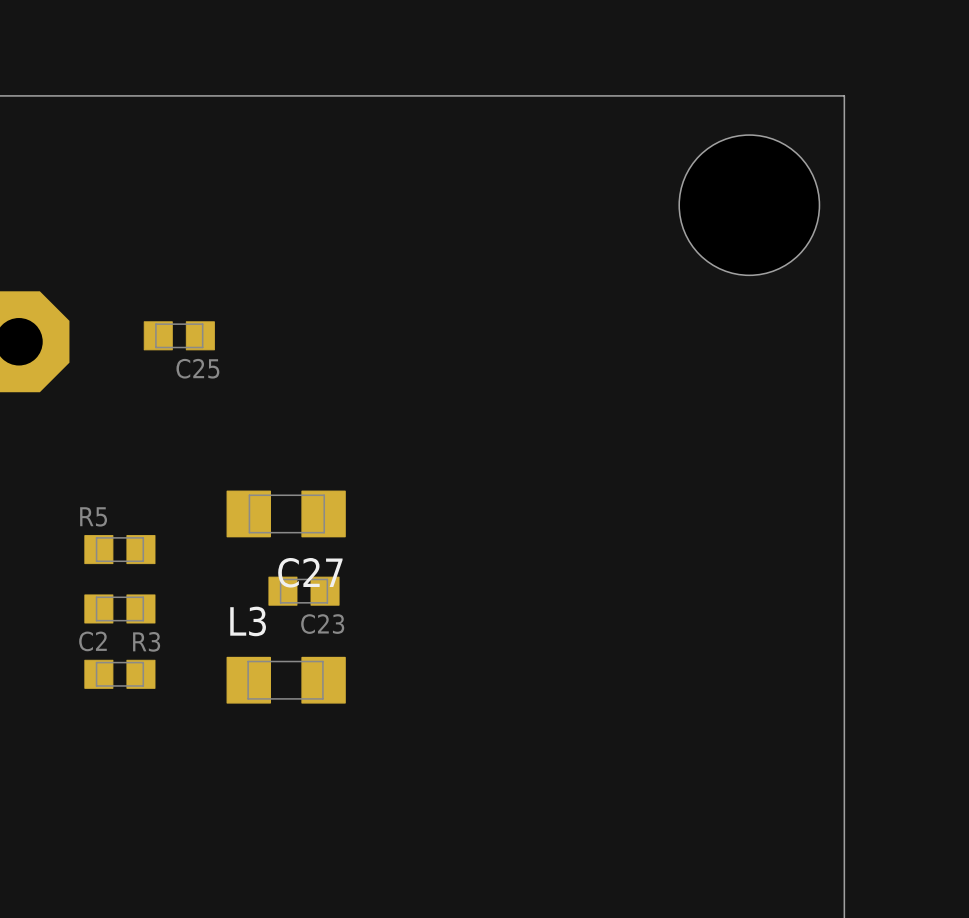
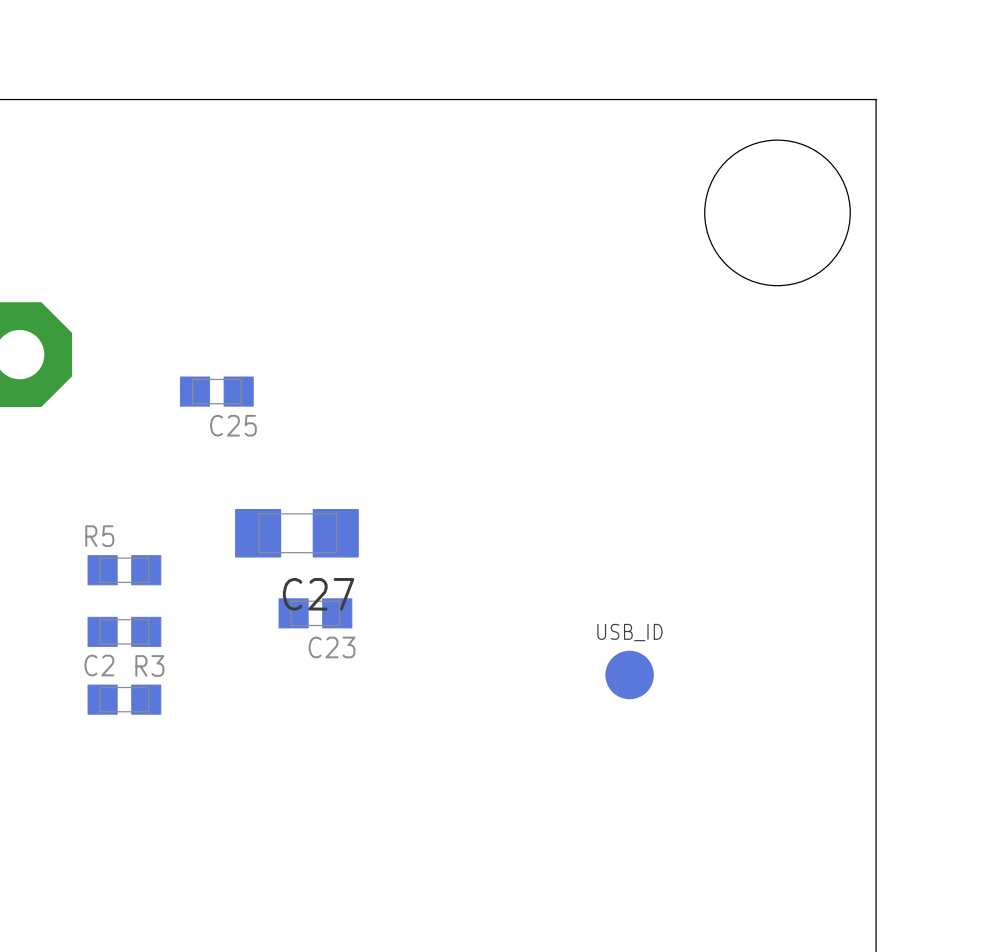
C25 position: (179, 335) -> (216, 391)
USB_ID: none -> (629, 674)
L3: (286, 680) -> none

